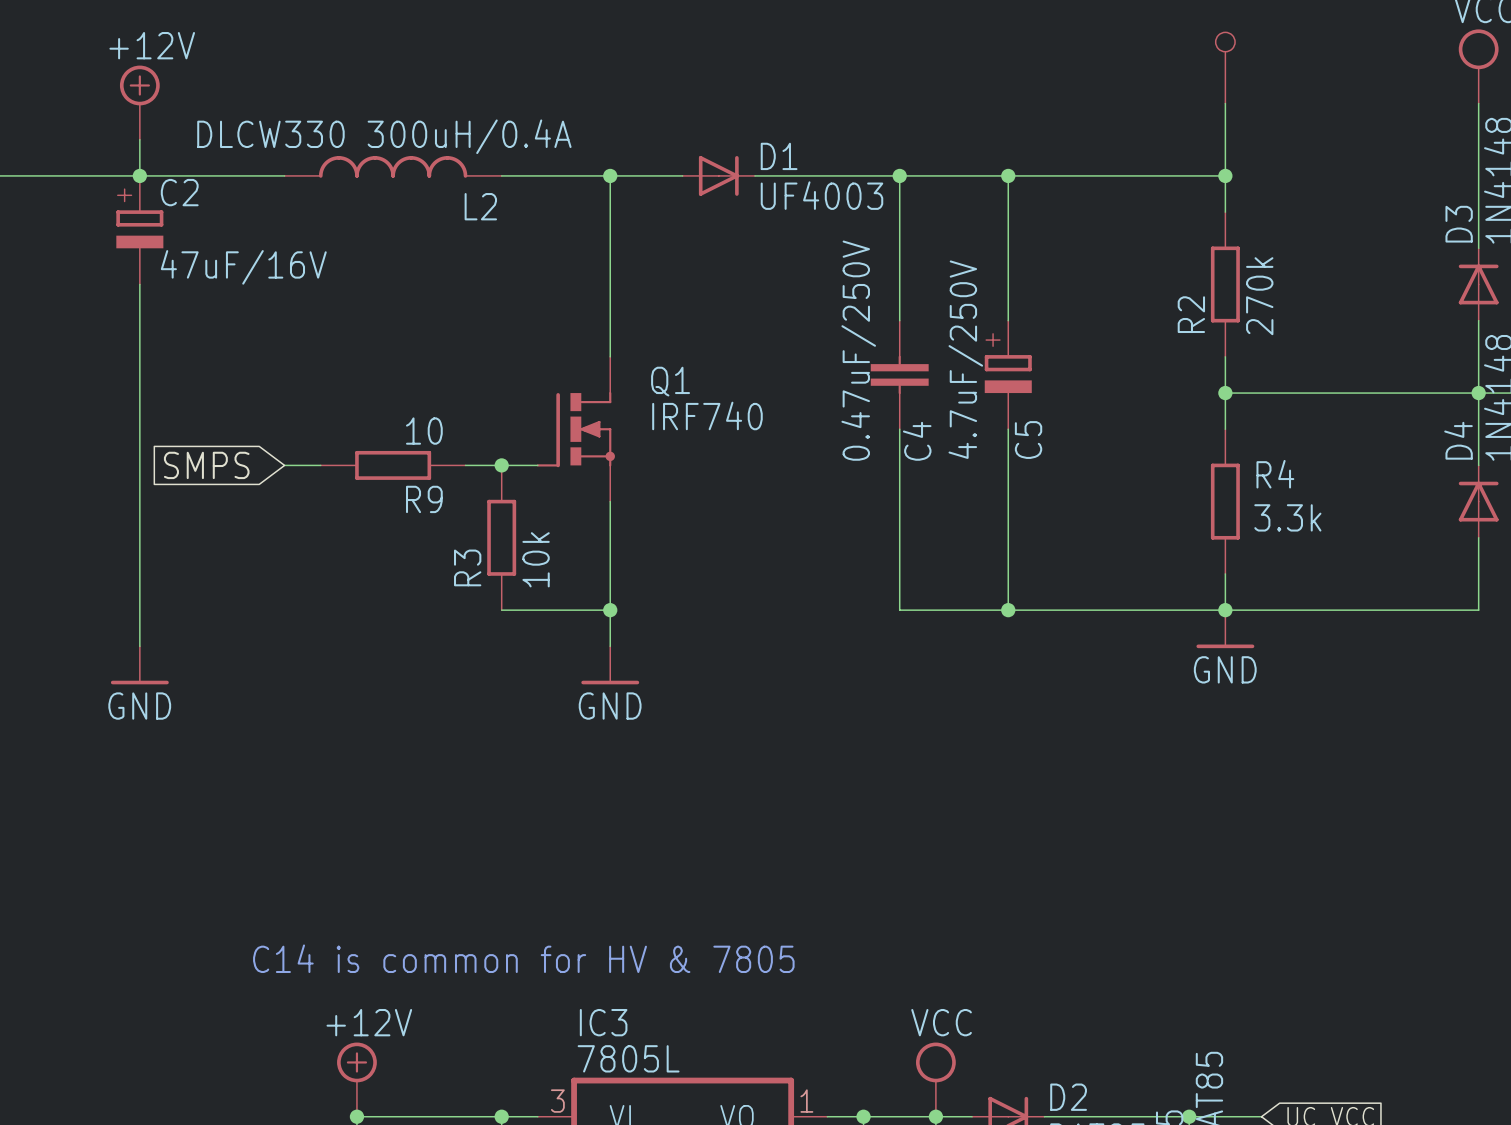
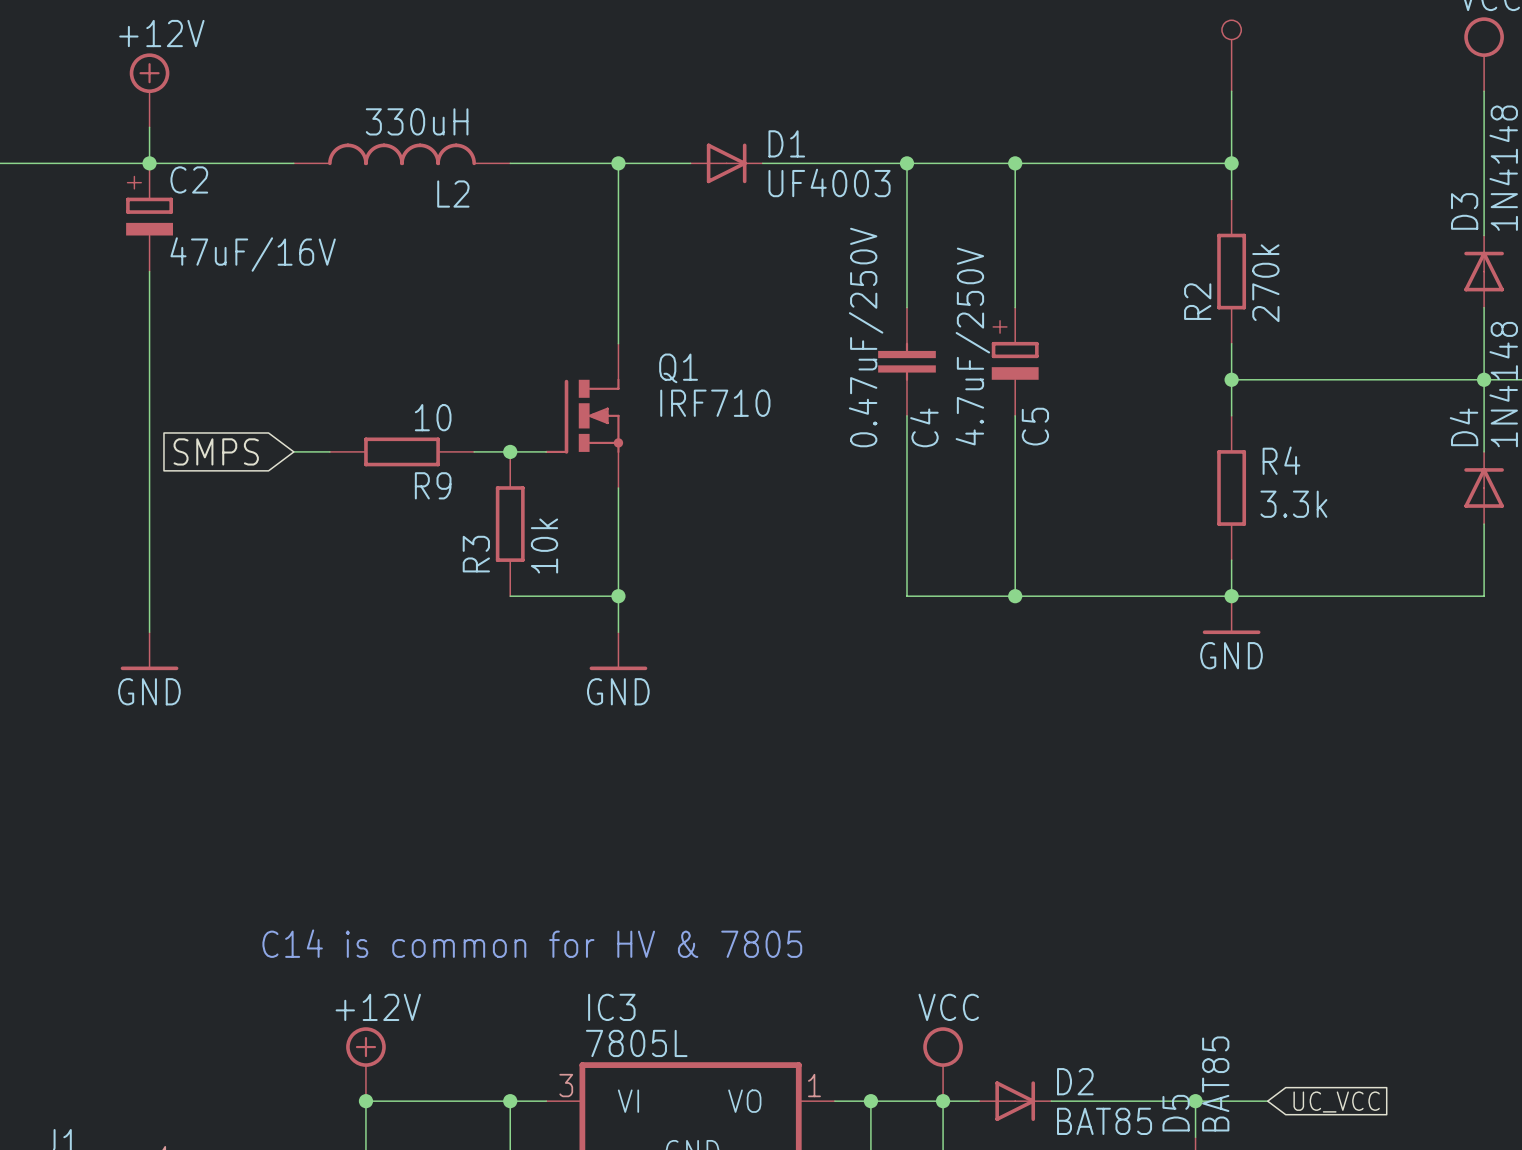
L2 value: DLCW330 300uH/0.4A (384, 136) -> 330uH (417, 121)
L2 name position: L2 (480, 206) -> L2 (453, 194)
Q1 value: IRF740 (707, 415) -> IRF710 (715, 403)

